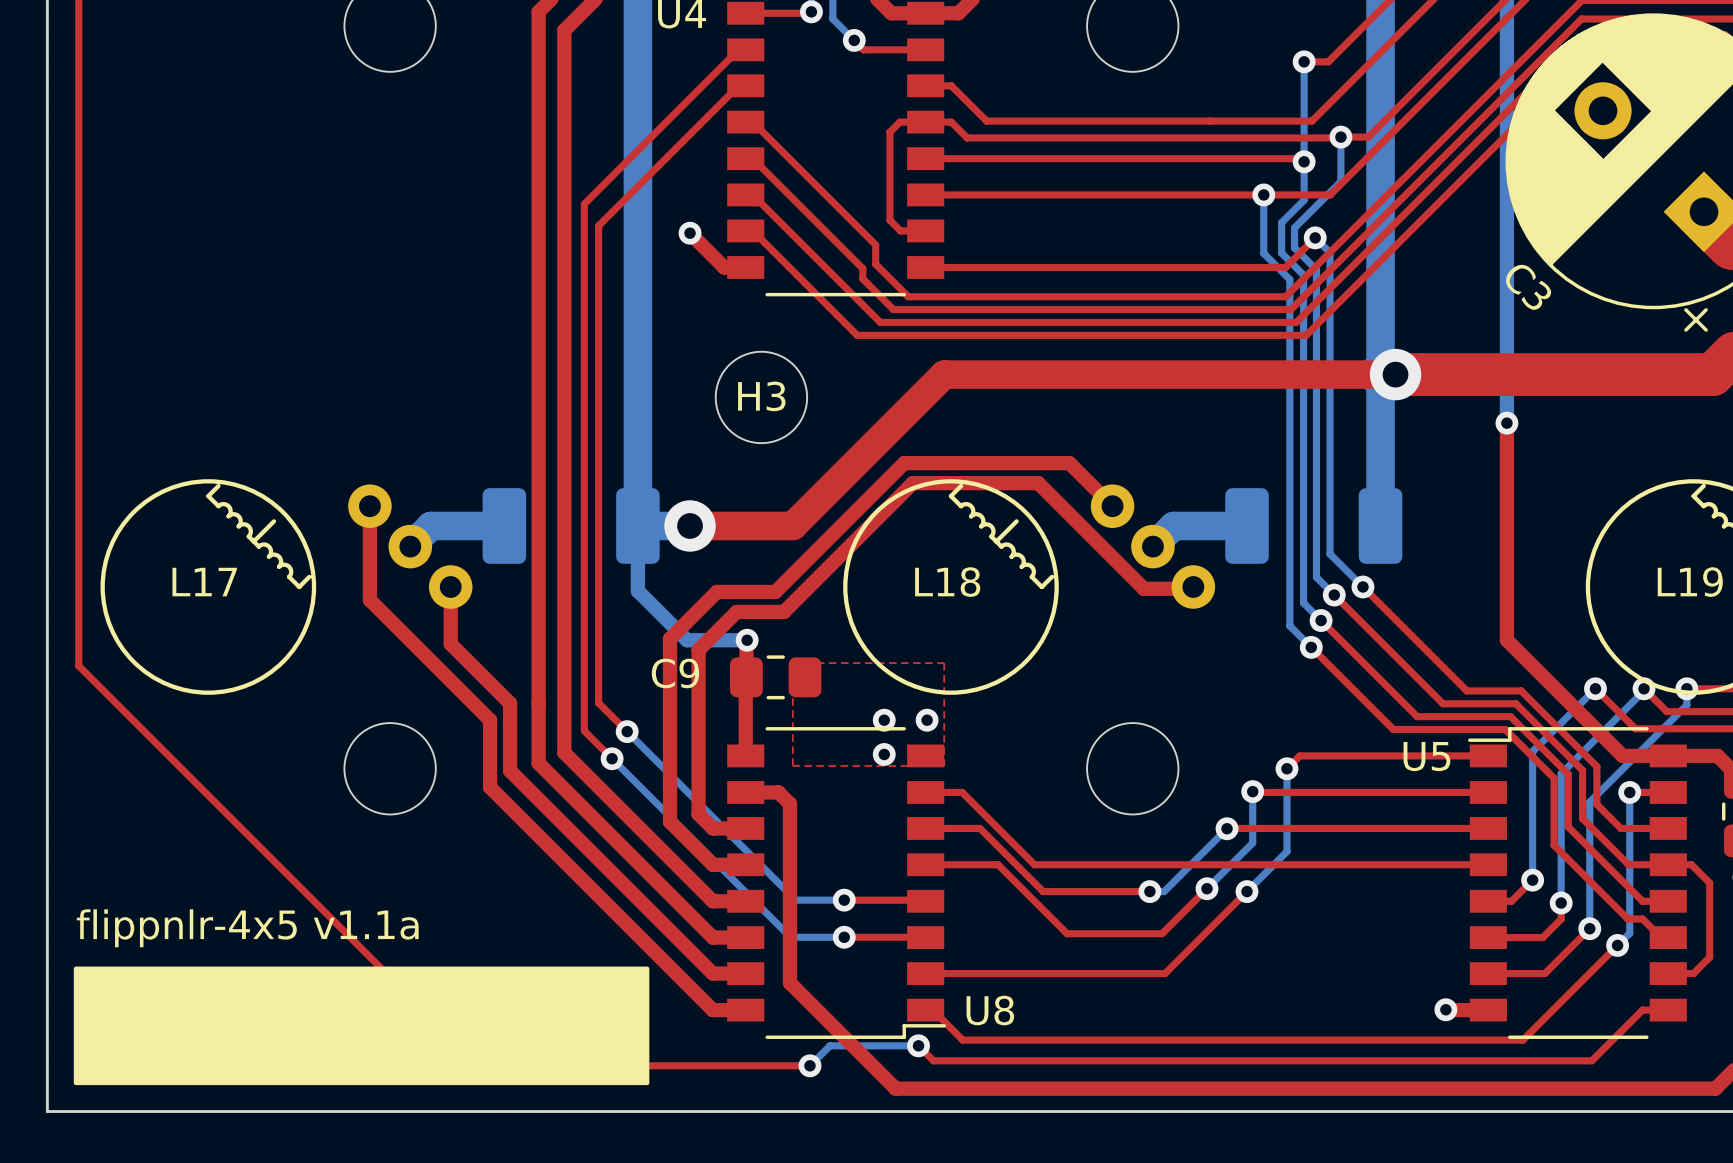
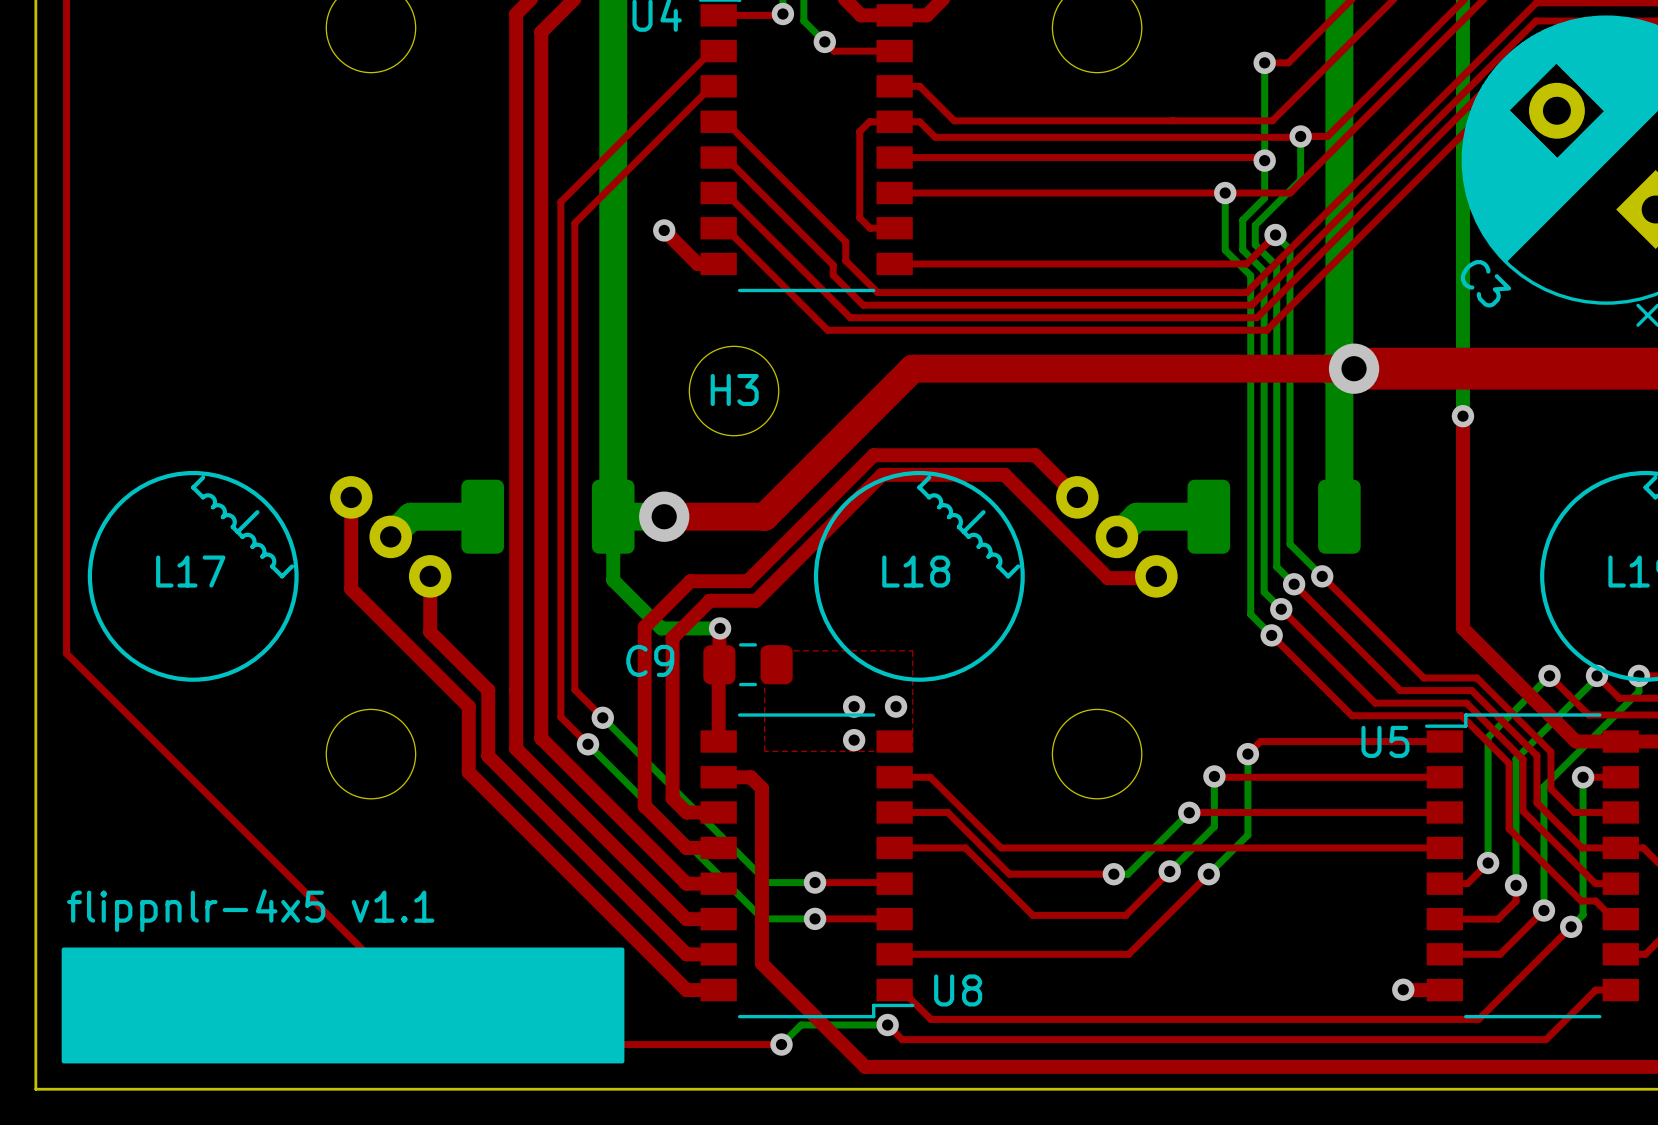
text: flippnlr-4x5 v1.1a (247, 928) -> flippnlr-4x5 v1.1 (250, 910)

